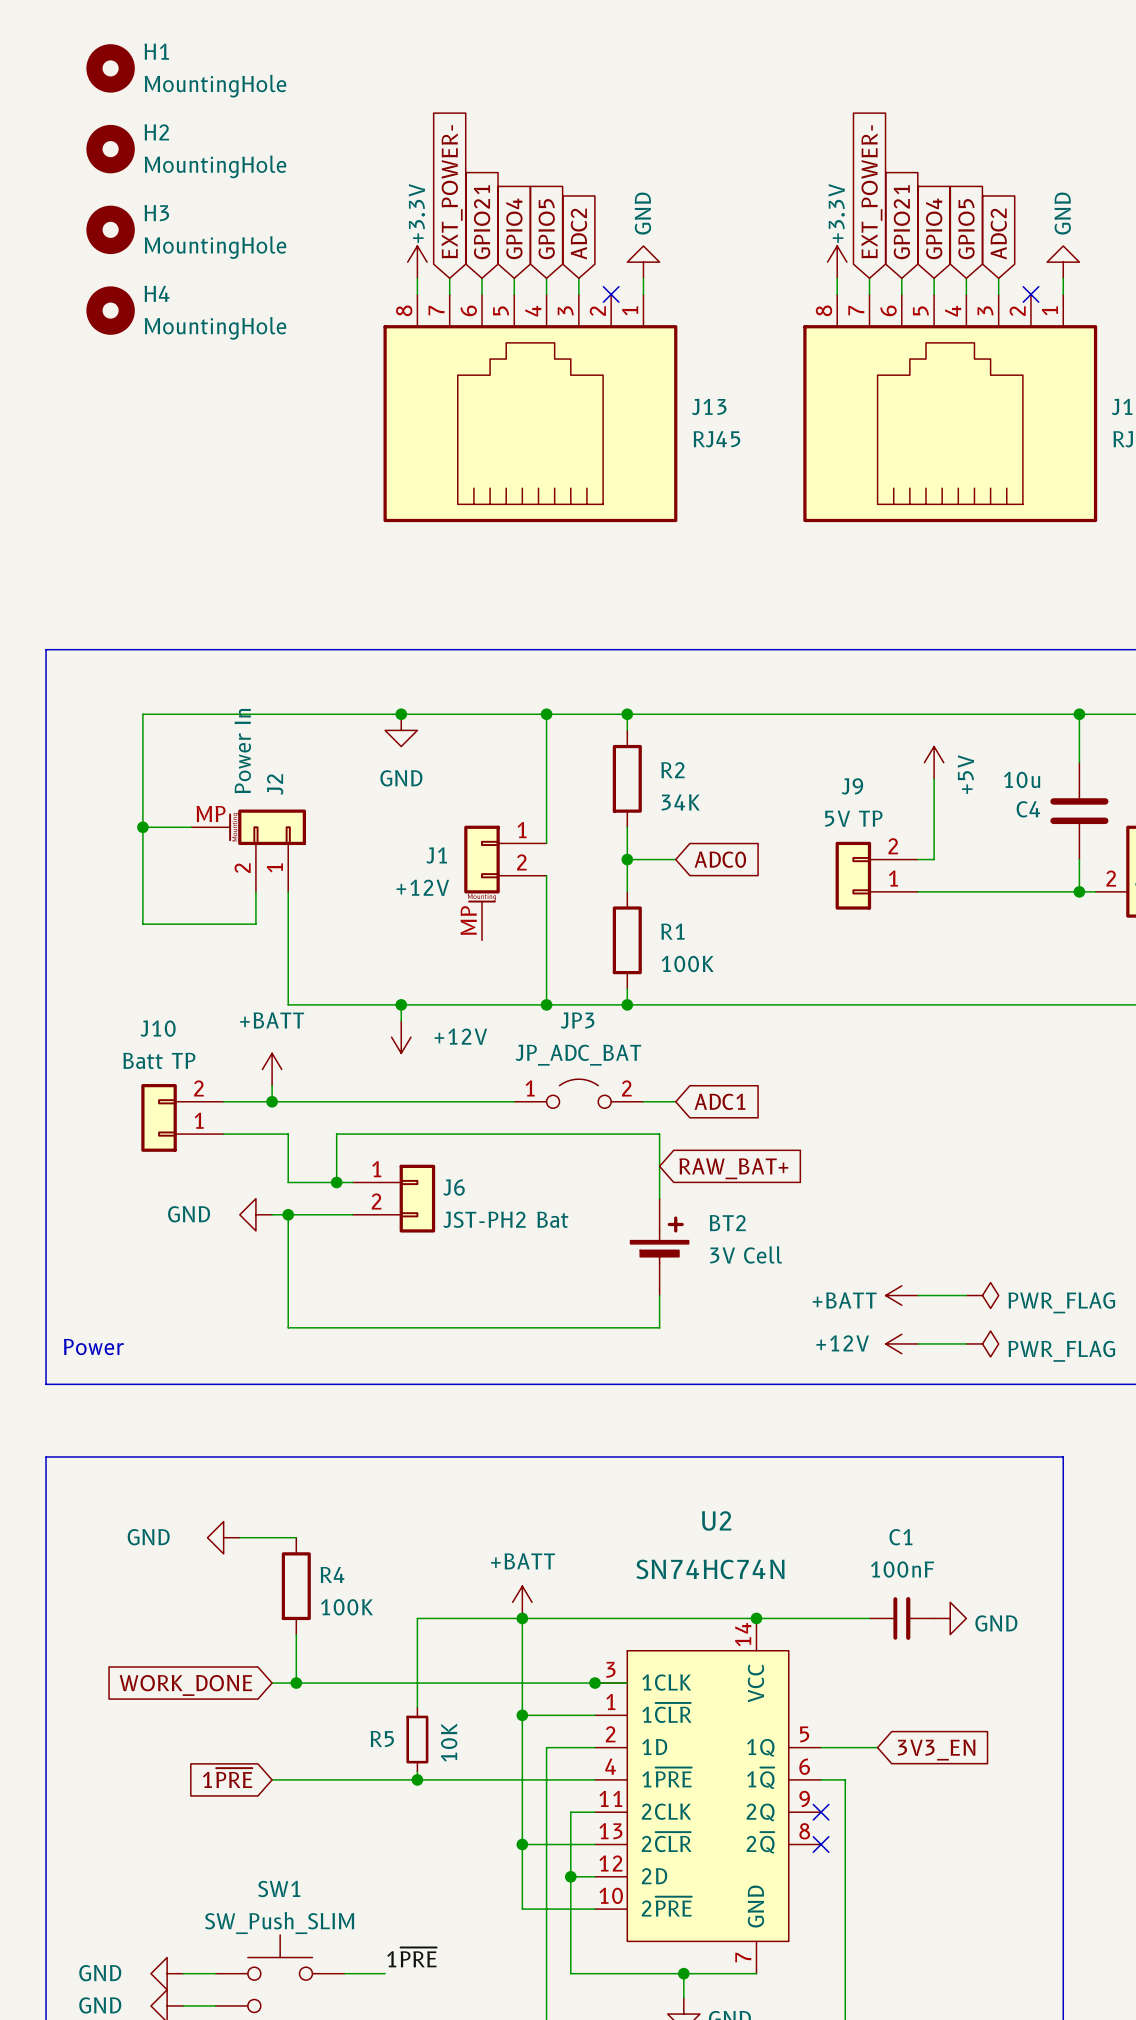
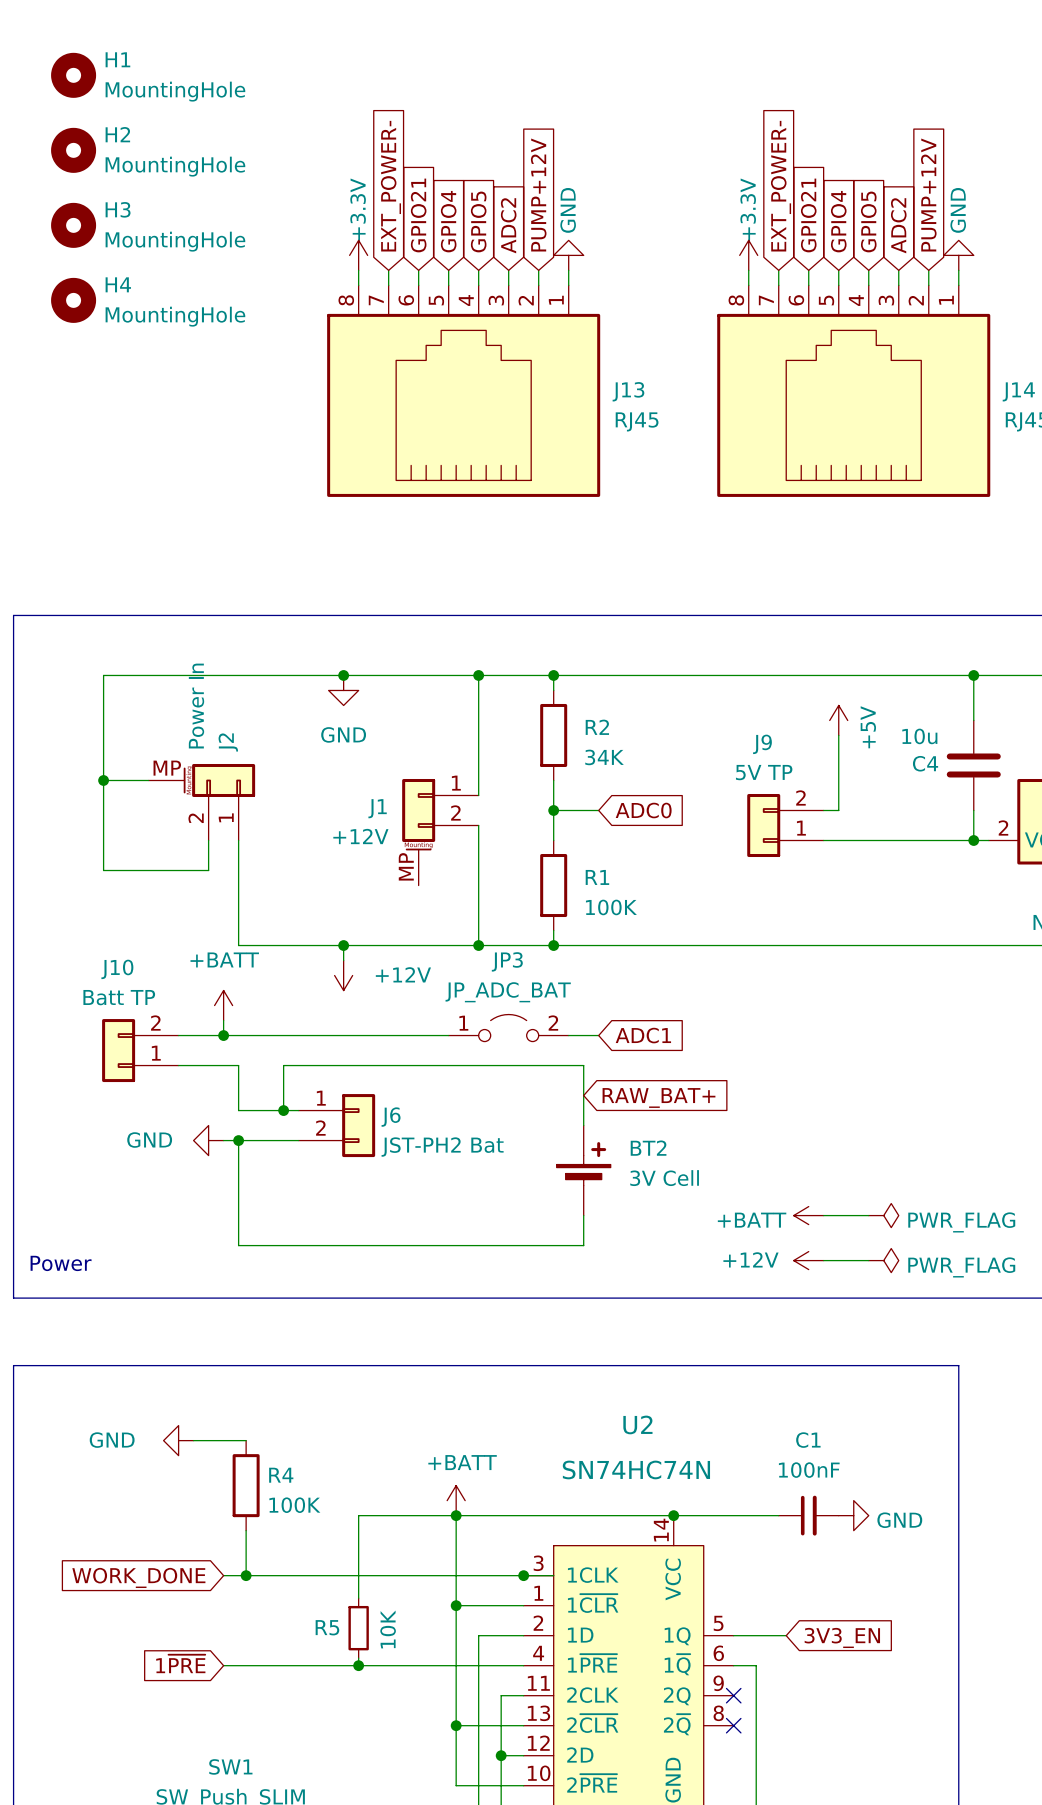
global label: none -> PUMP+12V (538, 195)
global label: none -> PUMP+12V (928, 195)
wire: none -> (538, 270) (538, 285)
wire: none -> (928, 270) (928, 285)
no-connect mark: (611, 294) -> none
no-connect mark: (1030, 294) -> none

